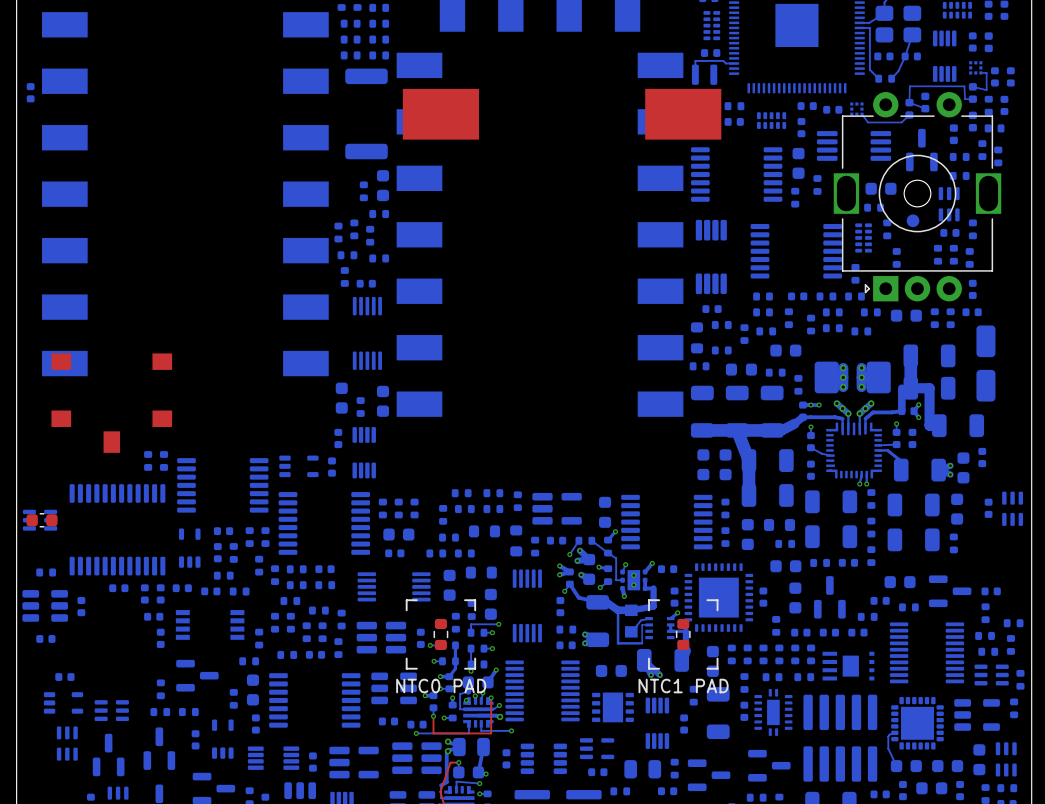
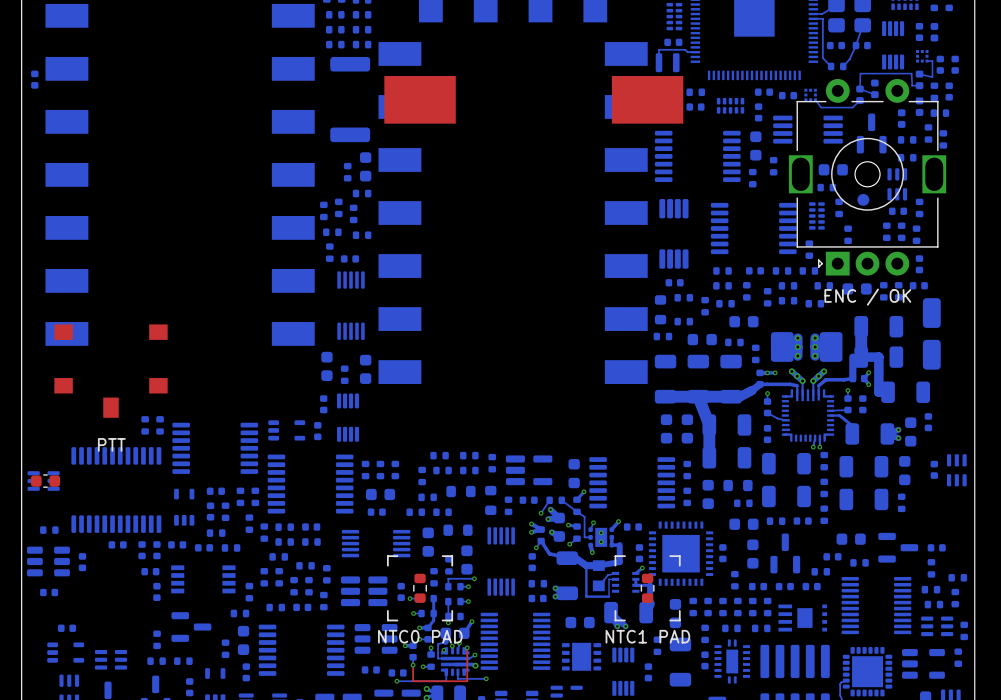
text: none -> ENC / OK (867, 297)
text: none -> PTT (111, 444)

